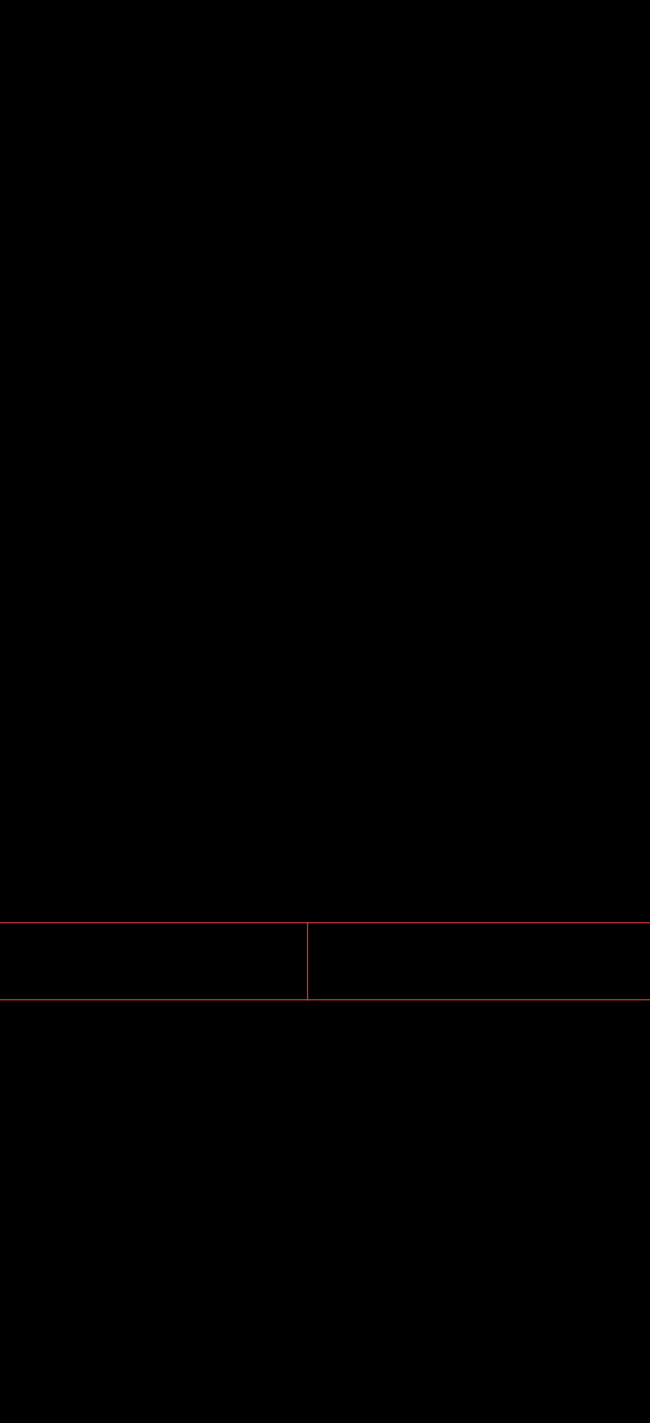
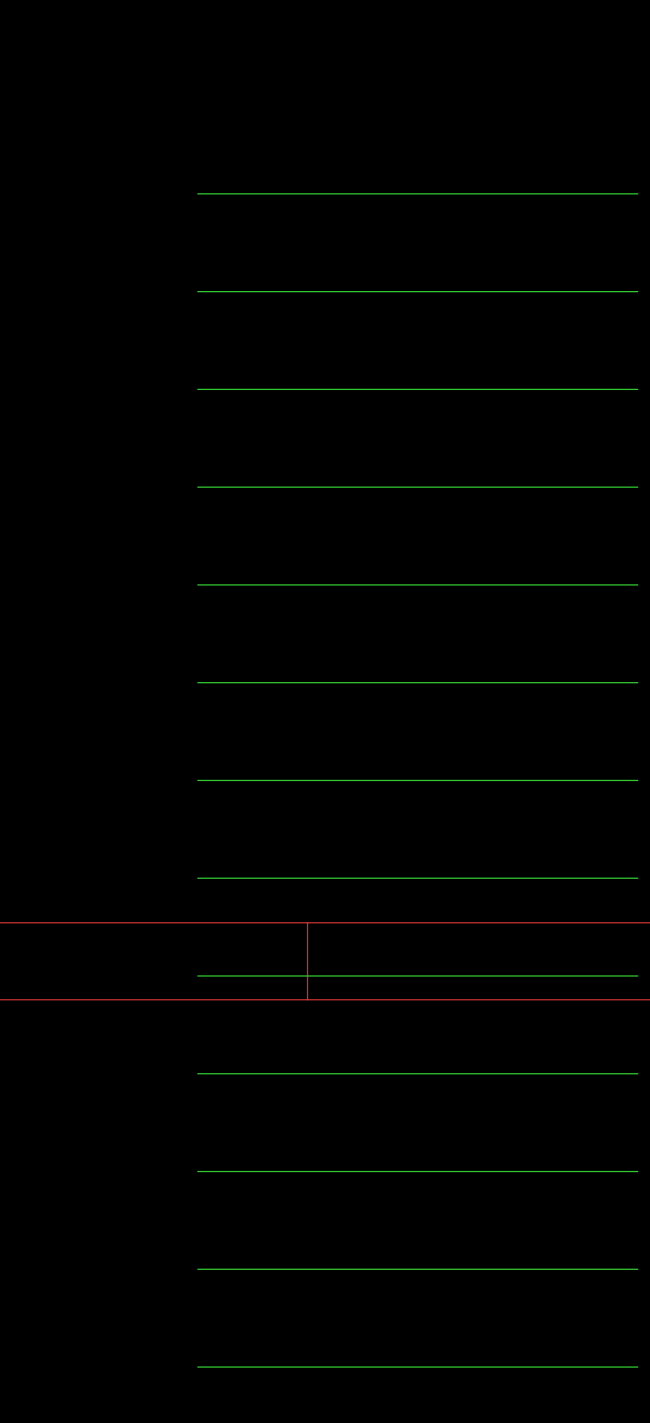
wire: none -> (197, 193) (637, 193)
wire: none -> (197, 291) (637, 291)
wire: none -> (197, 389) (637, 389)
wire: none -> (197, 487) (637, 487)
wire: none -> (197, 584) (637, 584)
wire: none -> (197, 682) (637, 682)
wire: none -> (197, 780) (637, 780)
wire: none -> (197, 878) (637, 878)
wire: none -> (197, 975) (637, 975)
wire: none -> (197, 1073) (637, 1073)
wire: none -> (197, 1171) (637, 1171)
wire: none -> (197, 1269) (637, 1269)
wire: none -> (197, 1367) (637, 1367)

